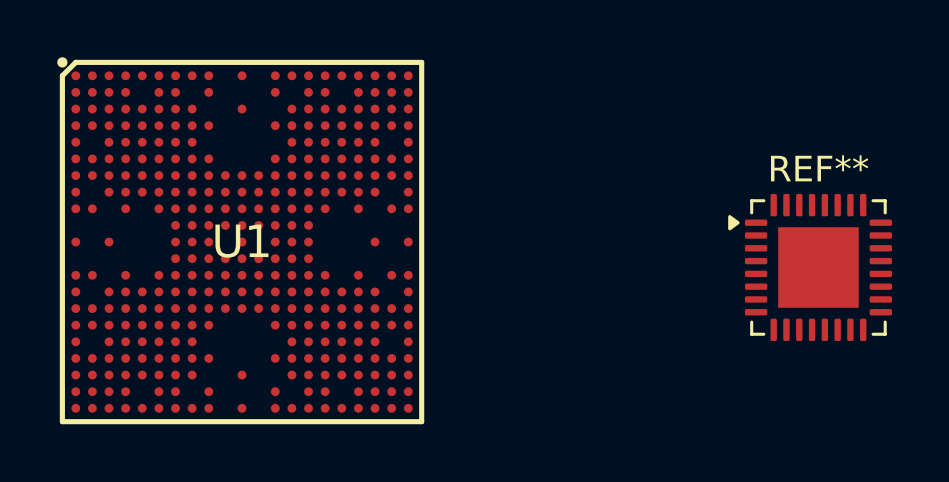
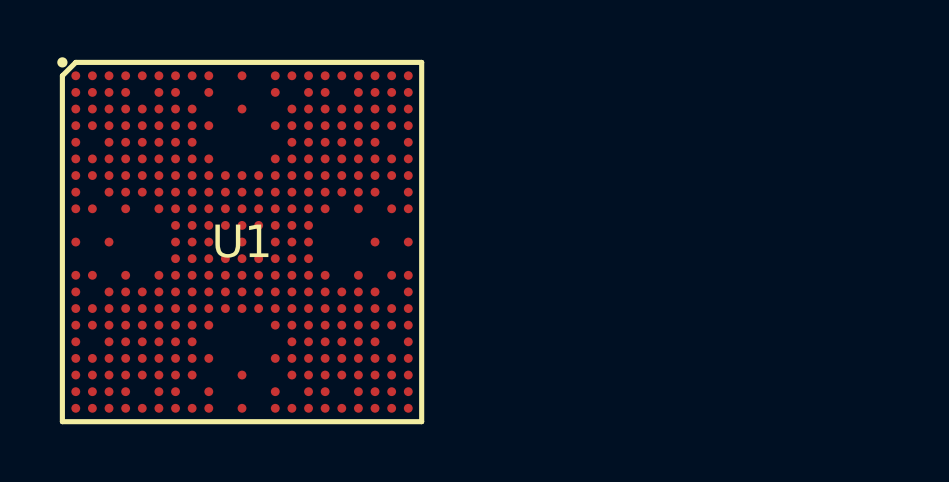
REF**: (810, 267) -> none

